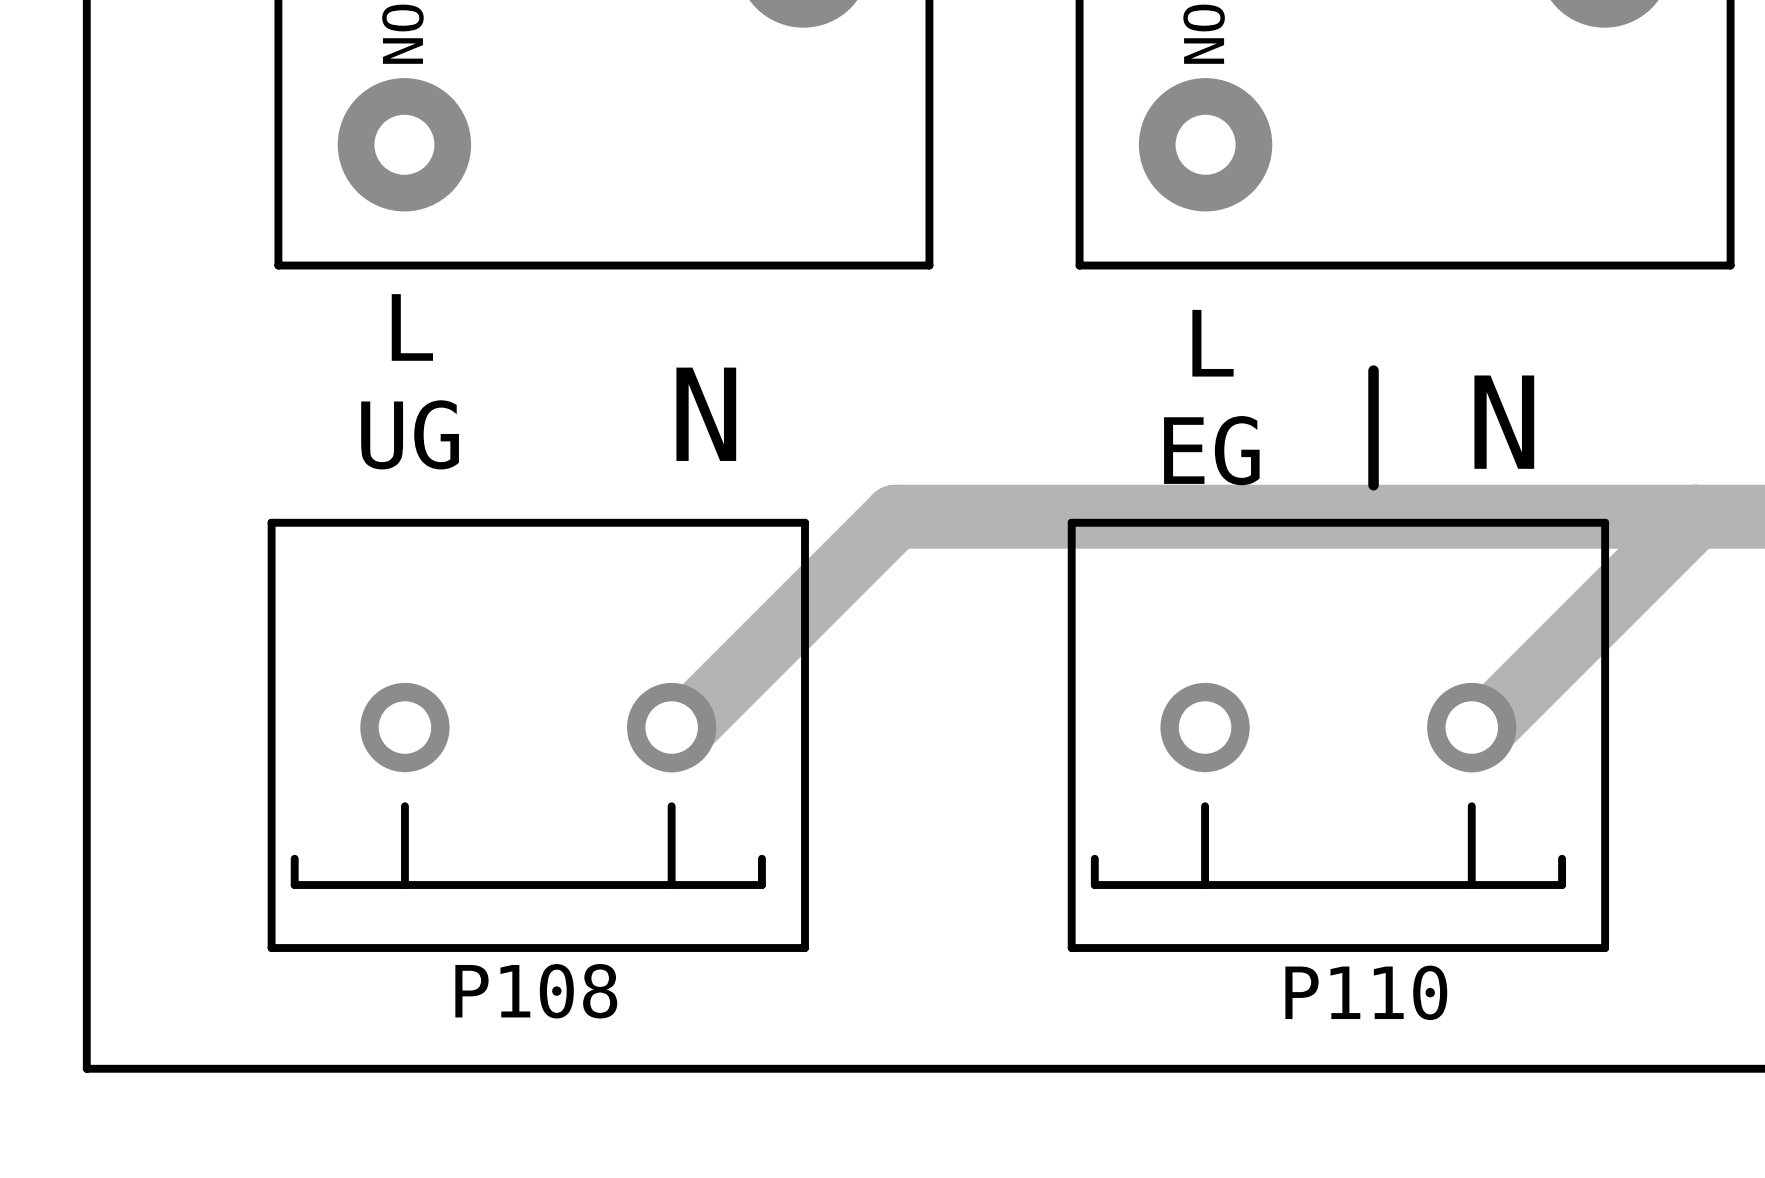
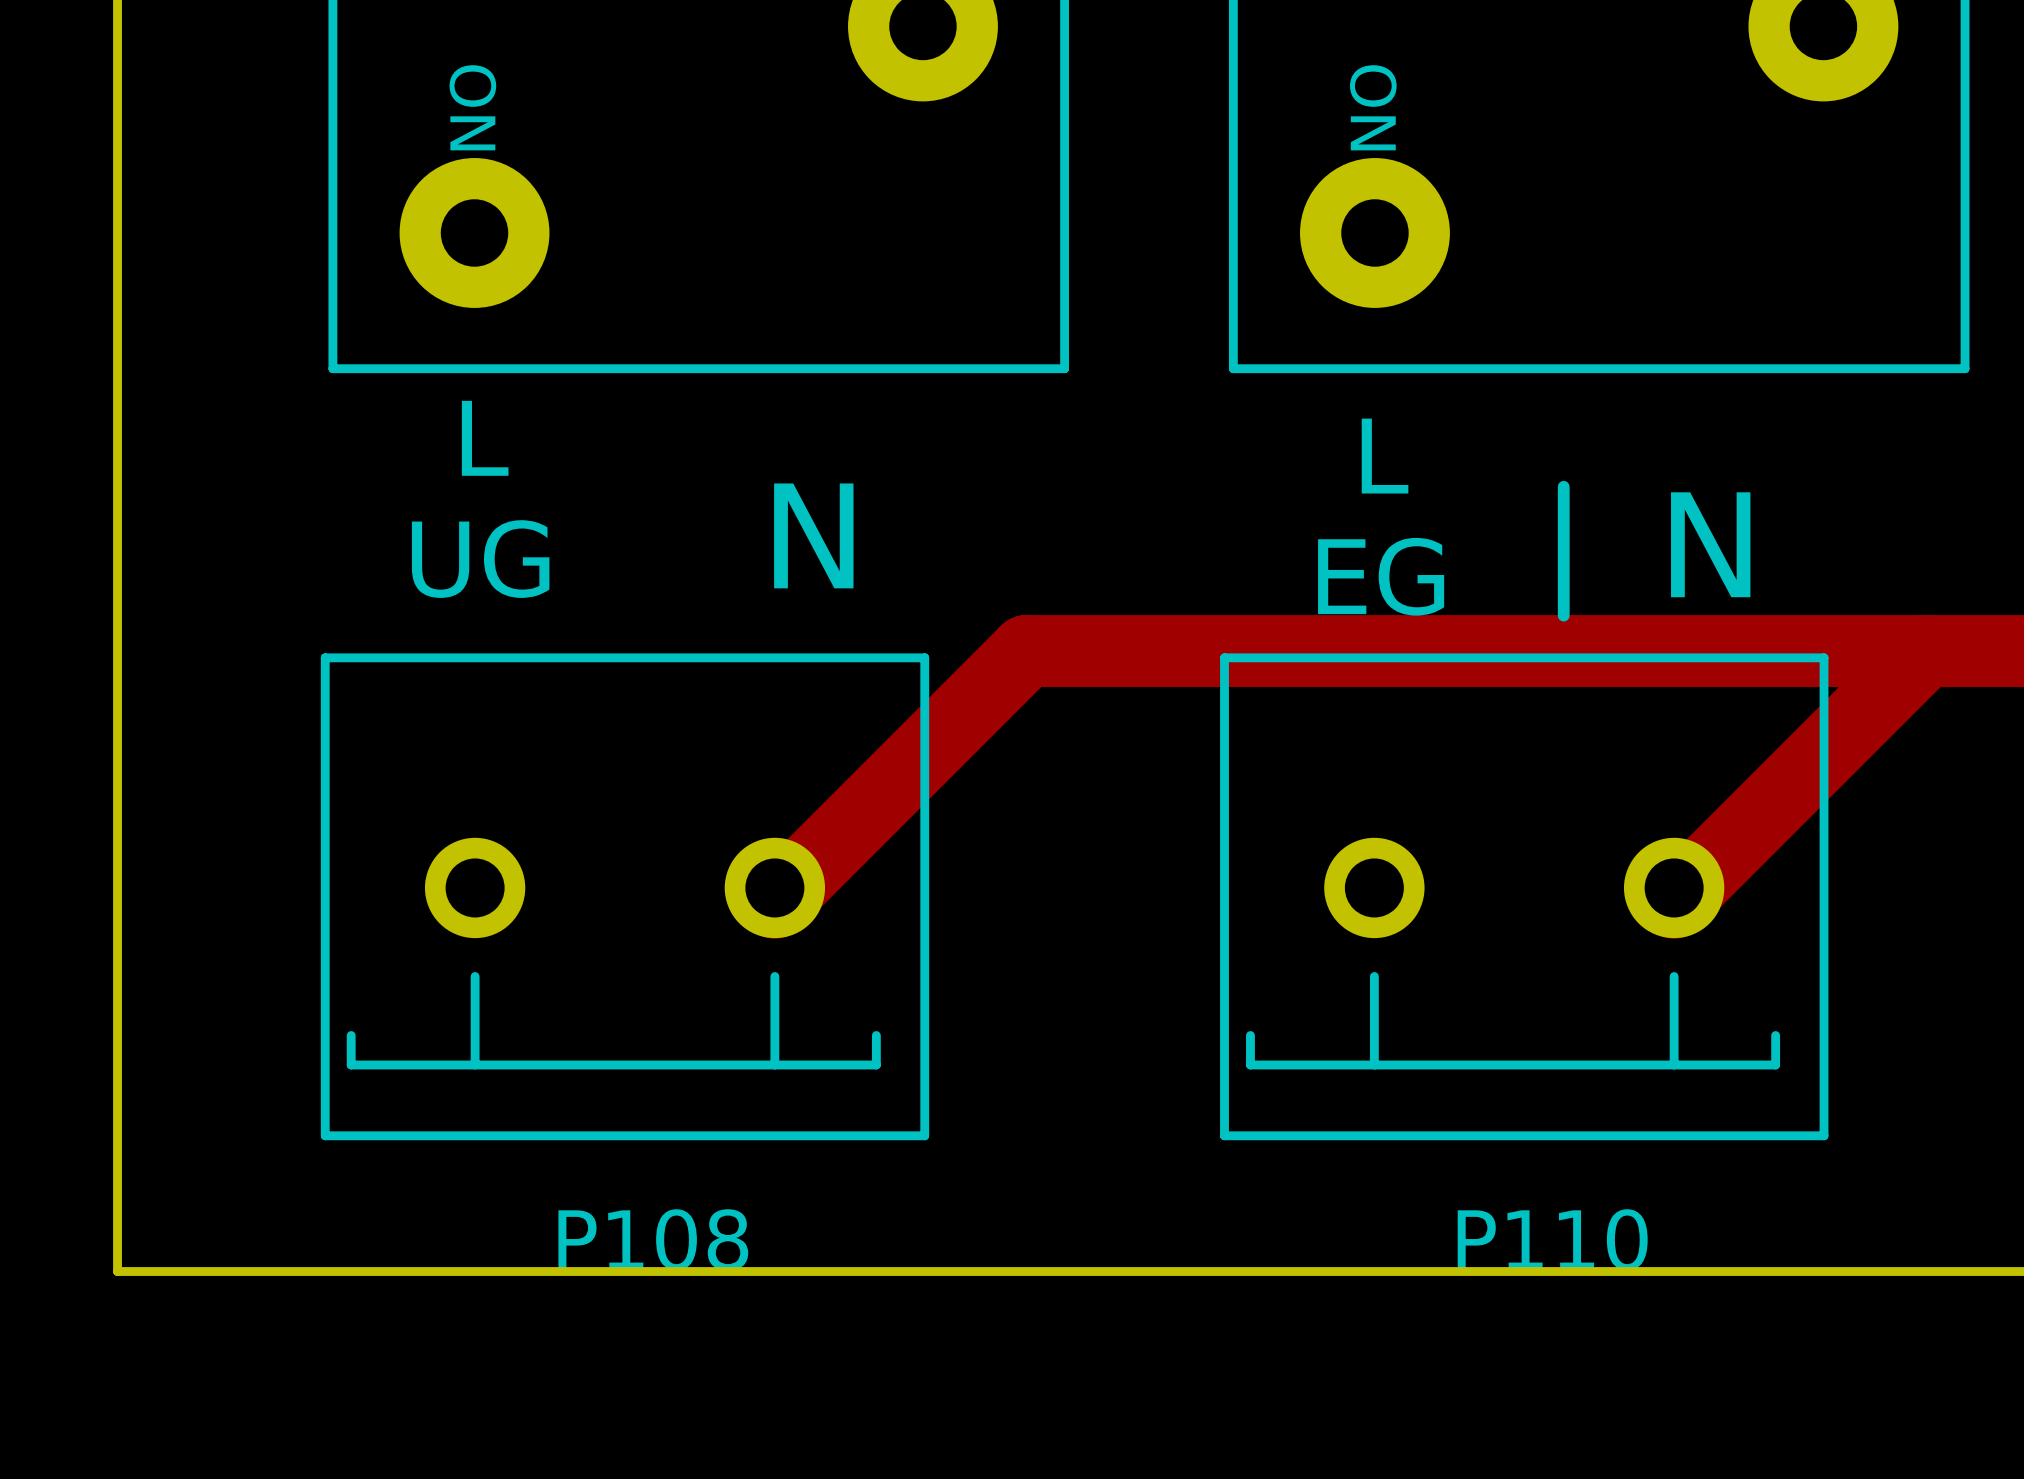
P108 name position: P108 (536, 991) -> P108 (653, 1239)
P110 name position: P110 (1366, 992) -> P110 (1552, 1239)

